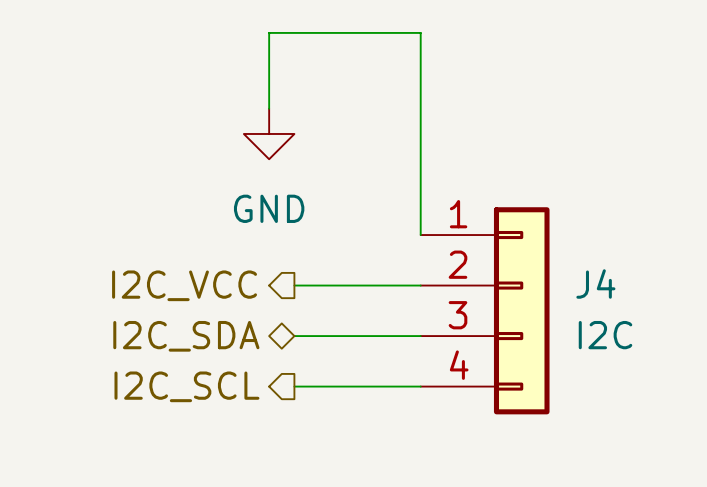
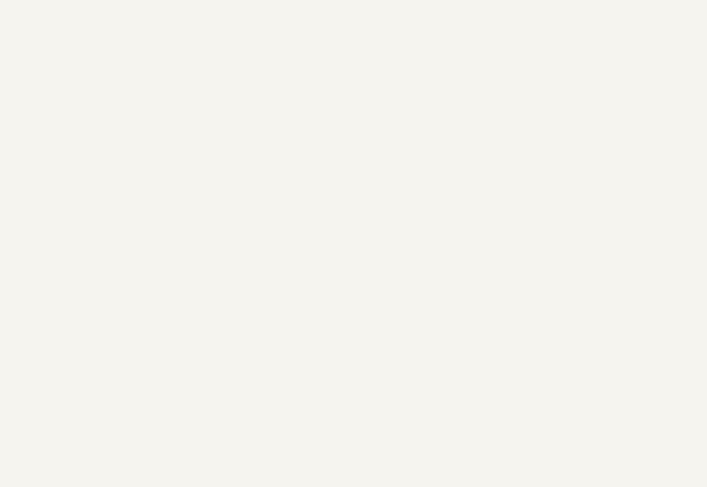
wire: (269, 108) (269, 32) (420, 32) (420, 235) -> none
power symbol: GND (269, 133) -> none
hierarchical label: I2C_VCC (184, 285) -> none
wire: (294, 285) (420, 285) -> none
J4: I2C (485, 310) -> none
hierarchical label: I2C_SDA (186, 336) -> none
wire: (294, 336) (420, 336) -> none
hierarchical label: I2C_SCL (186, 386) -> none
wire: (294, 386) (420, 386) -> none

